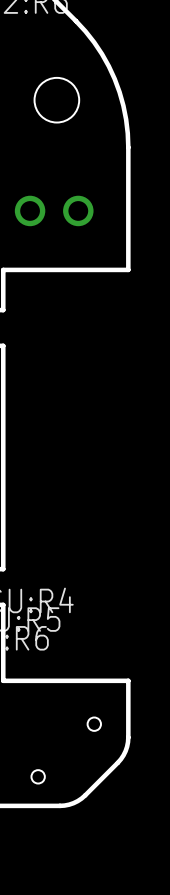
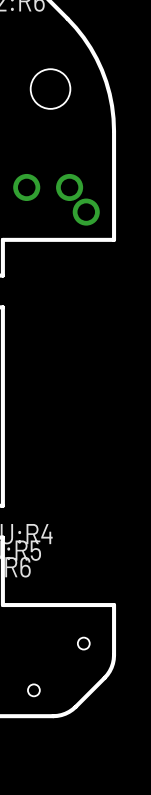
part: none -> (86, 212)

